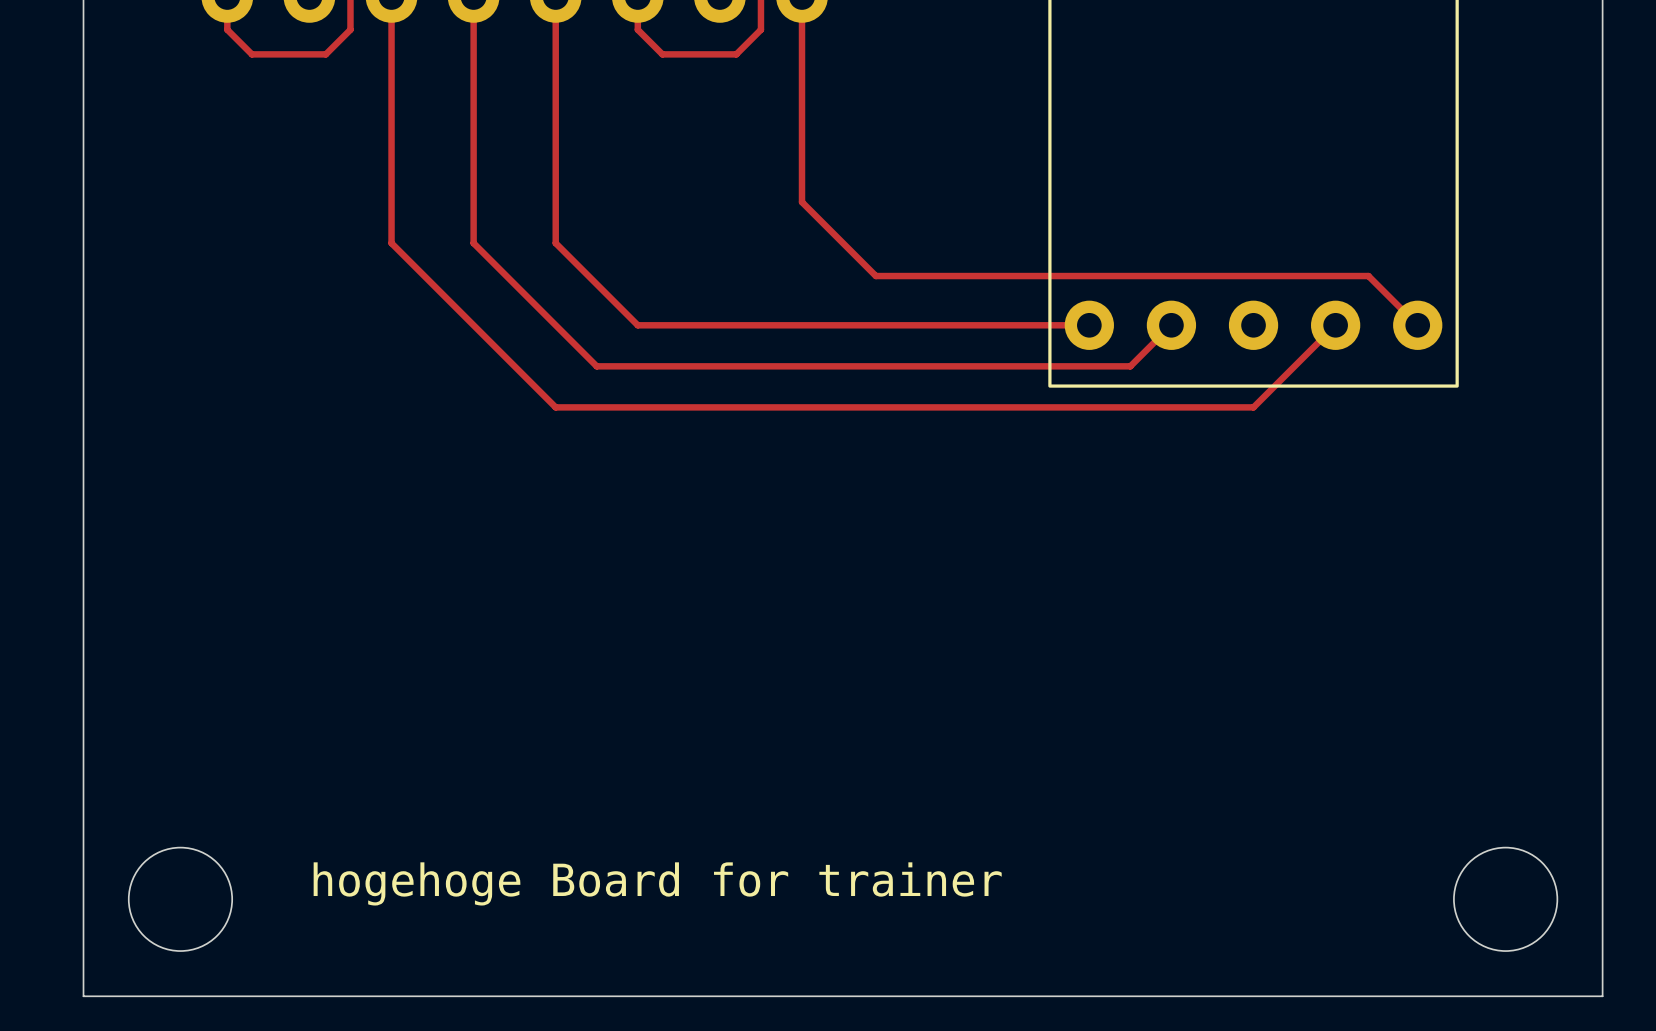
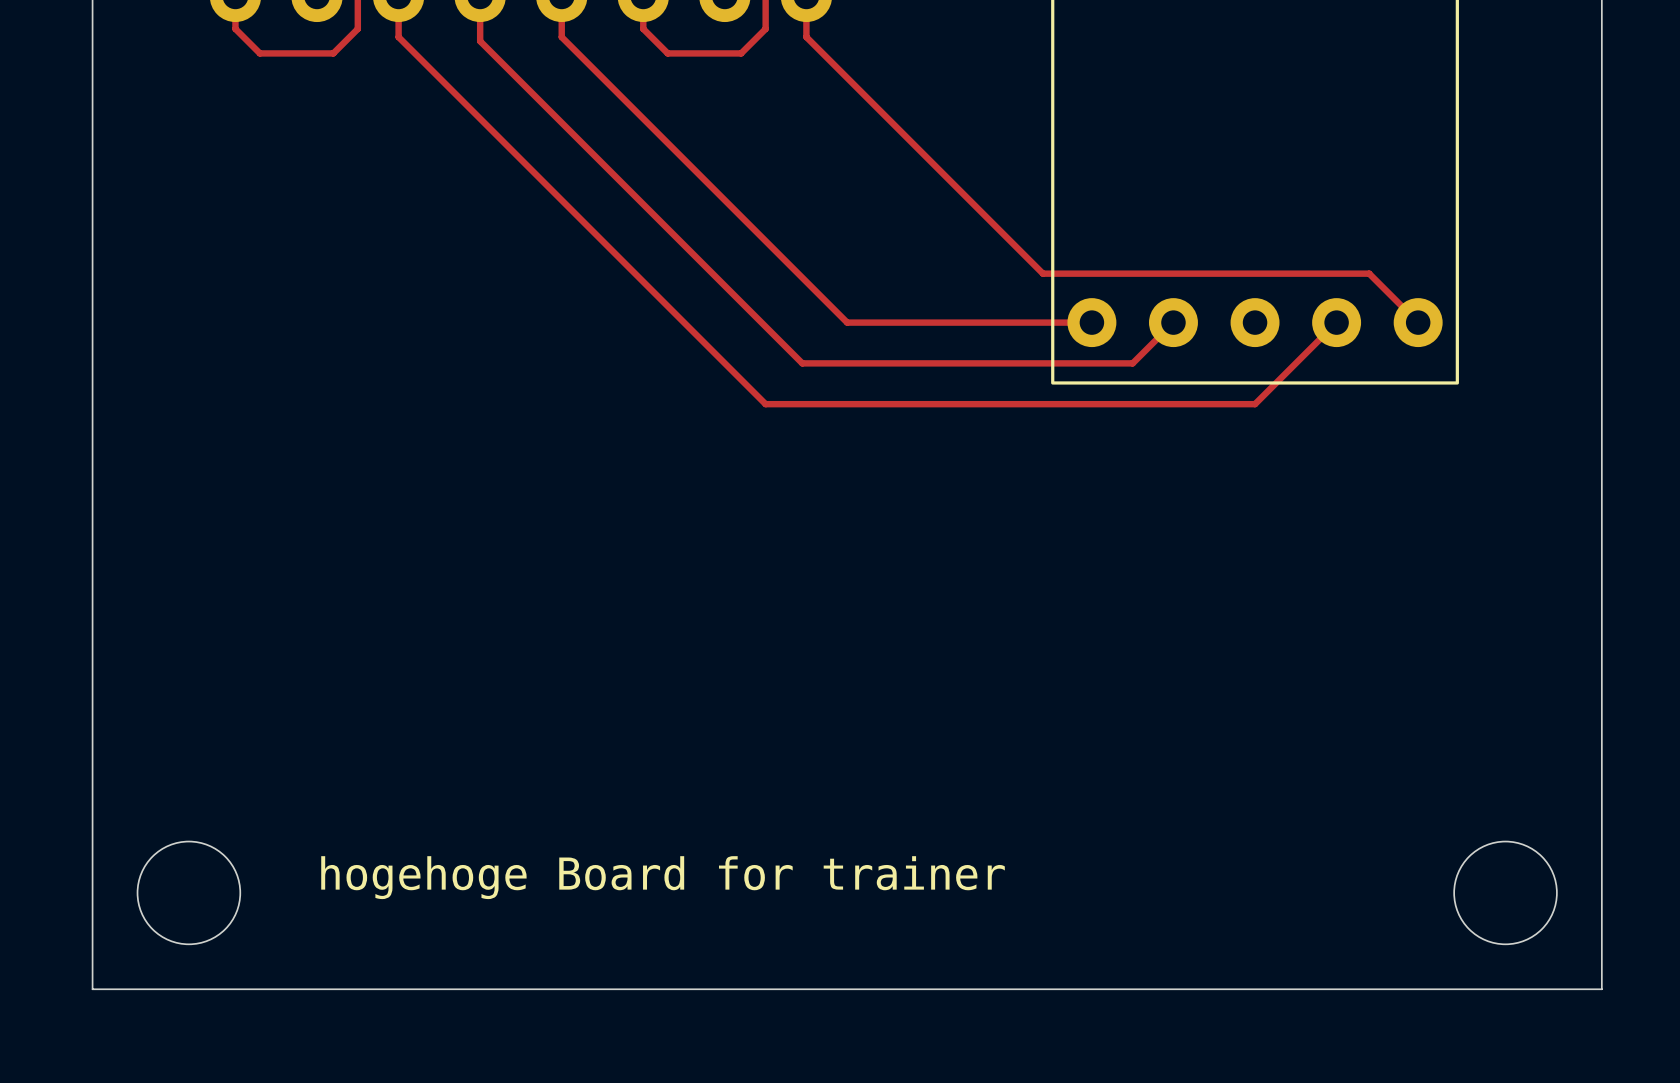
top track: (391, 37) (391, 243) (555, 407) (760, 407) -> (398, 37) (765, 404)
top track: (555, 37) (555, 243) (637, 325) (843, 325) -> (561, 37) (847, 322)
top track: (802, 37) (802, 202) (875, 276) (1040, 276) -> (806, 37) (1042, 273)
top track: (473, 42) (473, 243) (596, 366) (797, 366) -> (480, 41) (802, 363)

